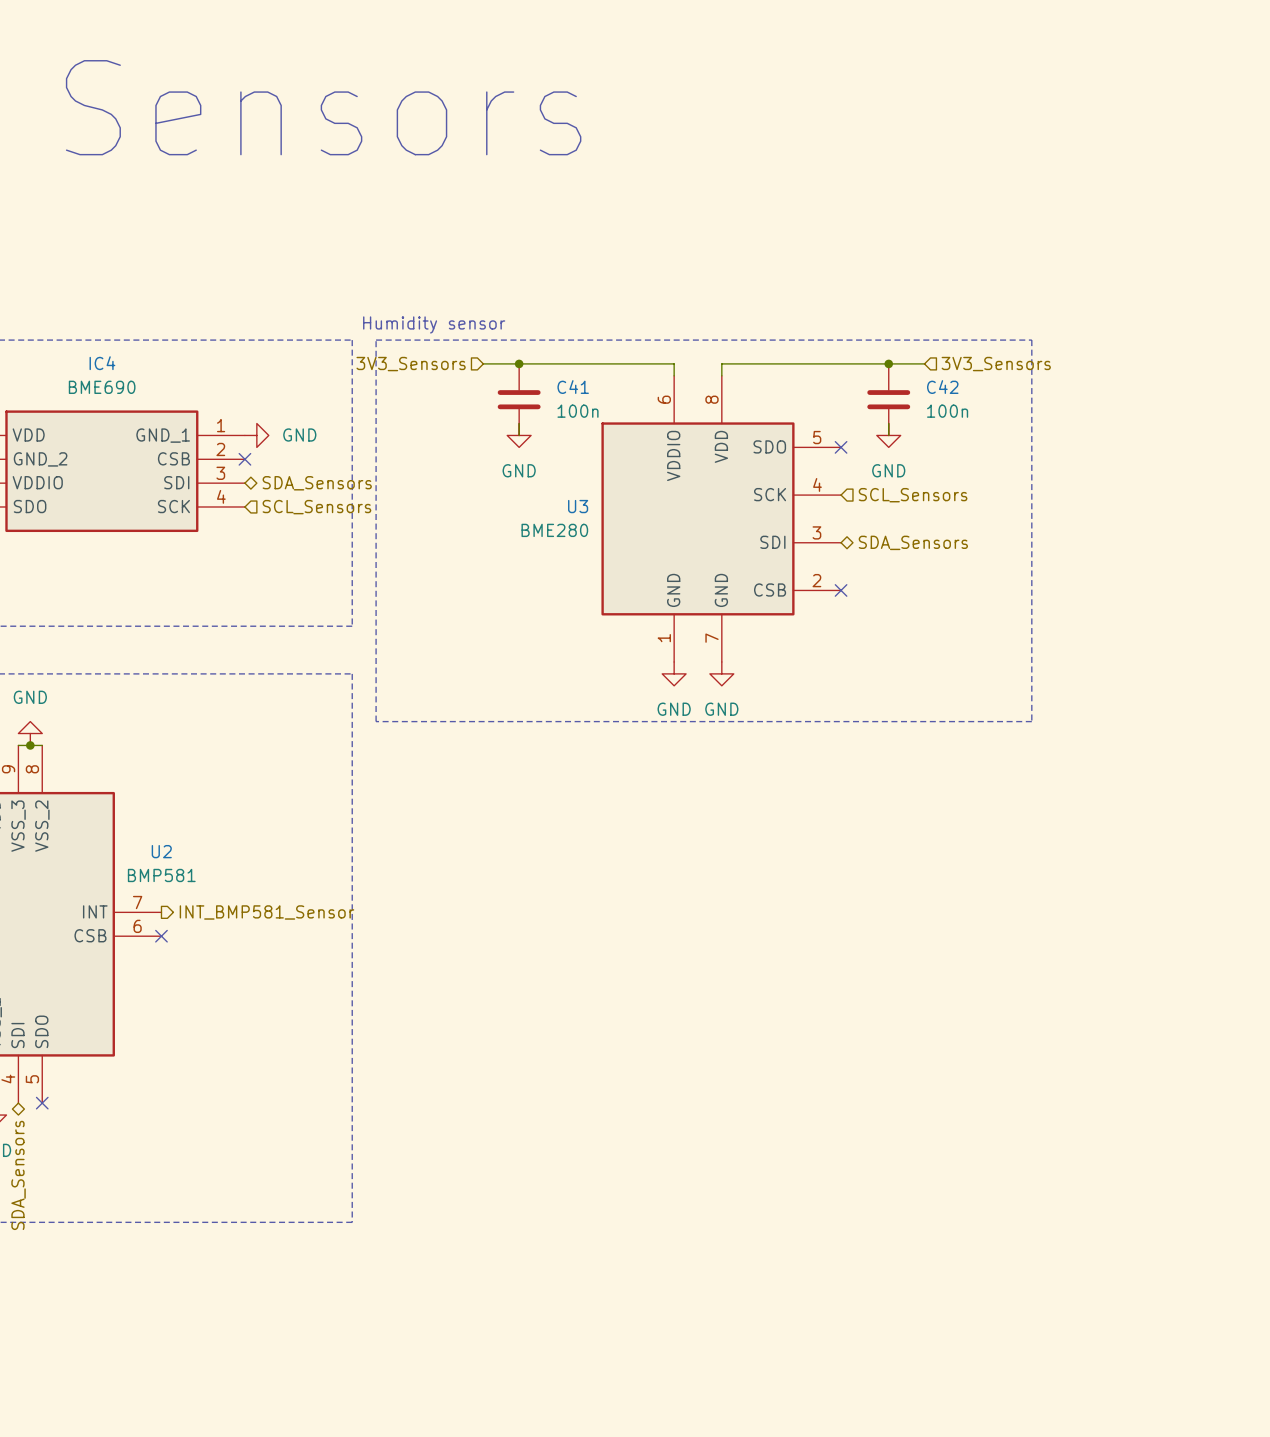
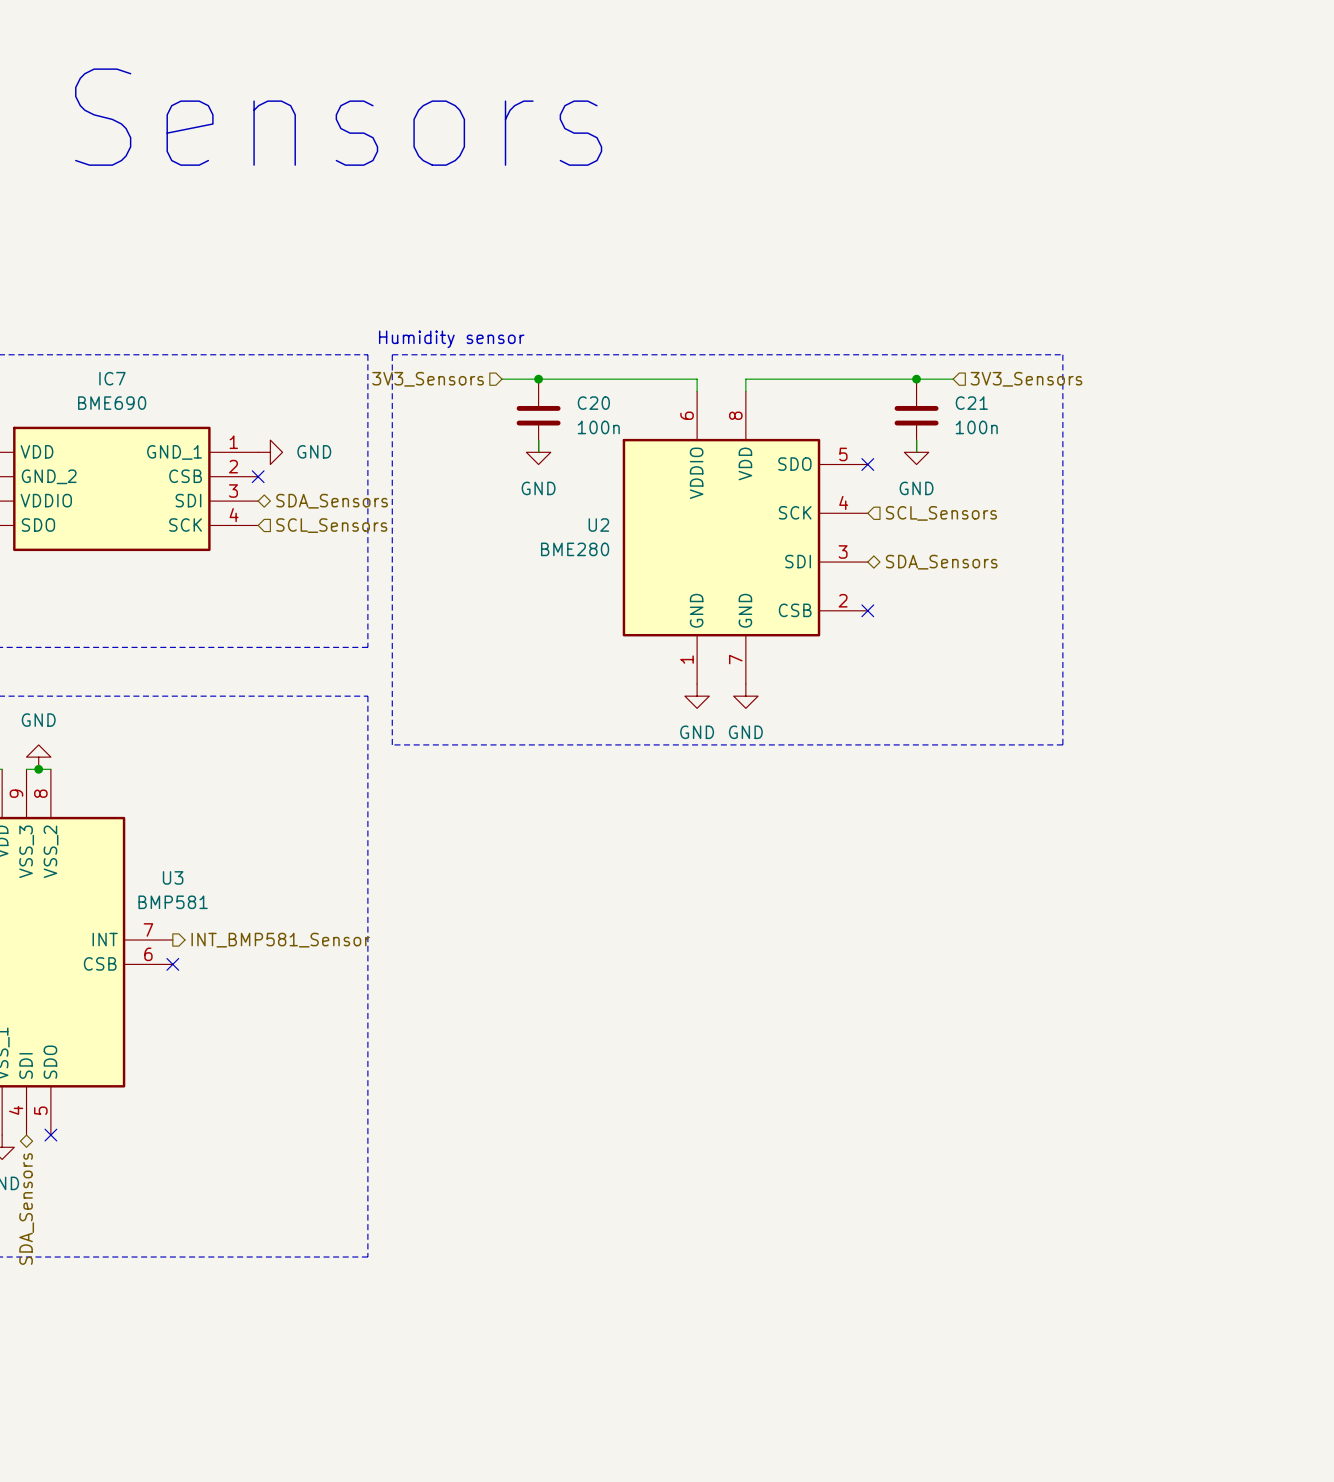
IC4 name: IC4 (102, 363) -> IC7 (112, 378)
C41 name: C41 (573, 387) -> C20 (593, 403)
C42 name: C42 (942, 387) -> C21 (971, 403)
U3 name: U3 (578, 506) -> U2 (598, 525)
U2 name: U2 (161, 851) -> U3 (173, 877)

